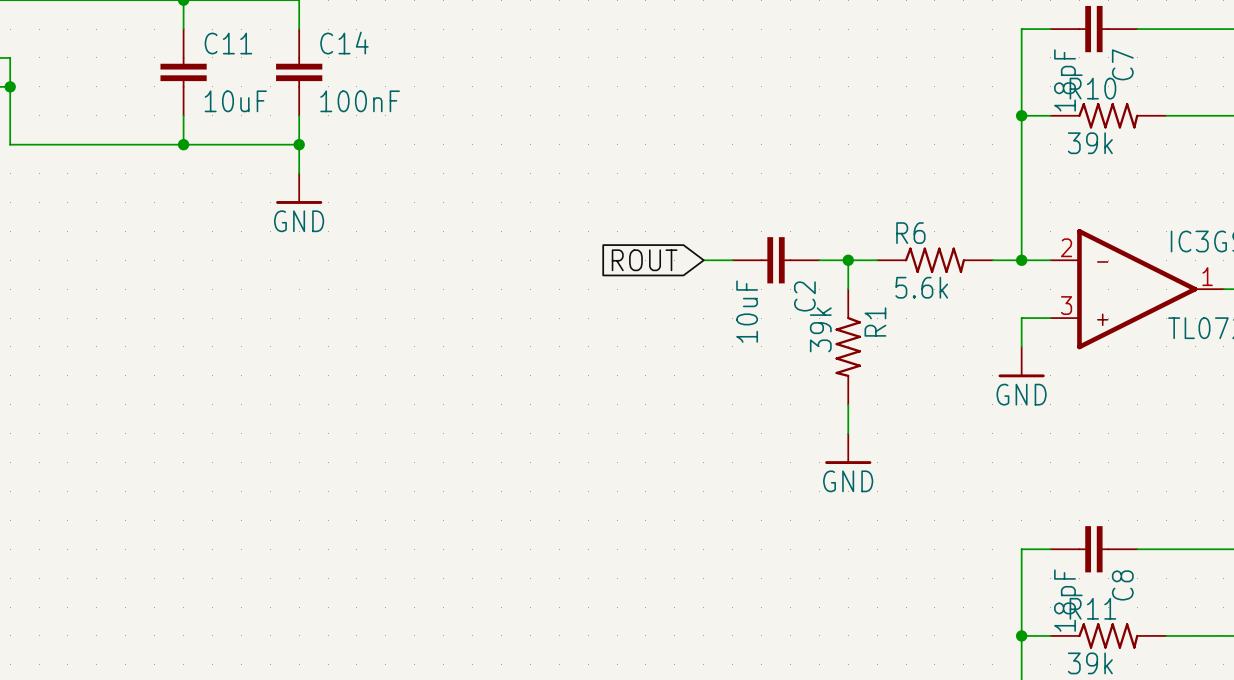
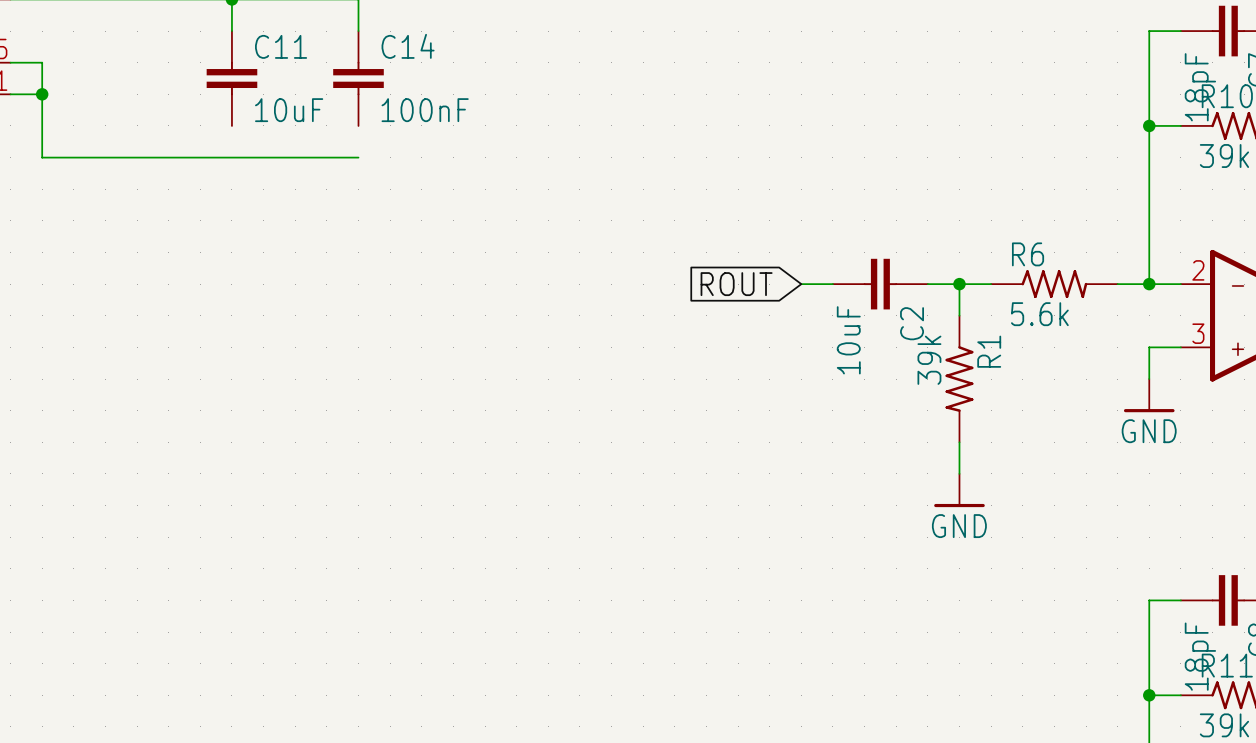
wire: (183, 115) (183, 144) -> none
wire: (299, 115) (299, 173) -> none
junction: (183, 144) -> none
junction: (299, 144) -> none
power symbol: GND (299, 188) -> none

